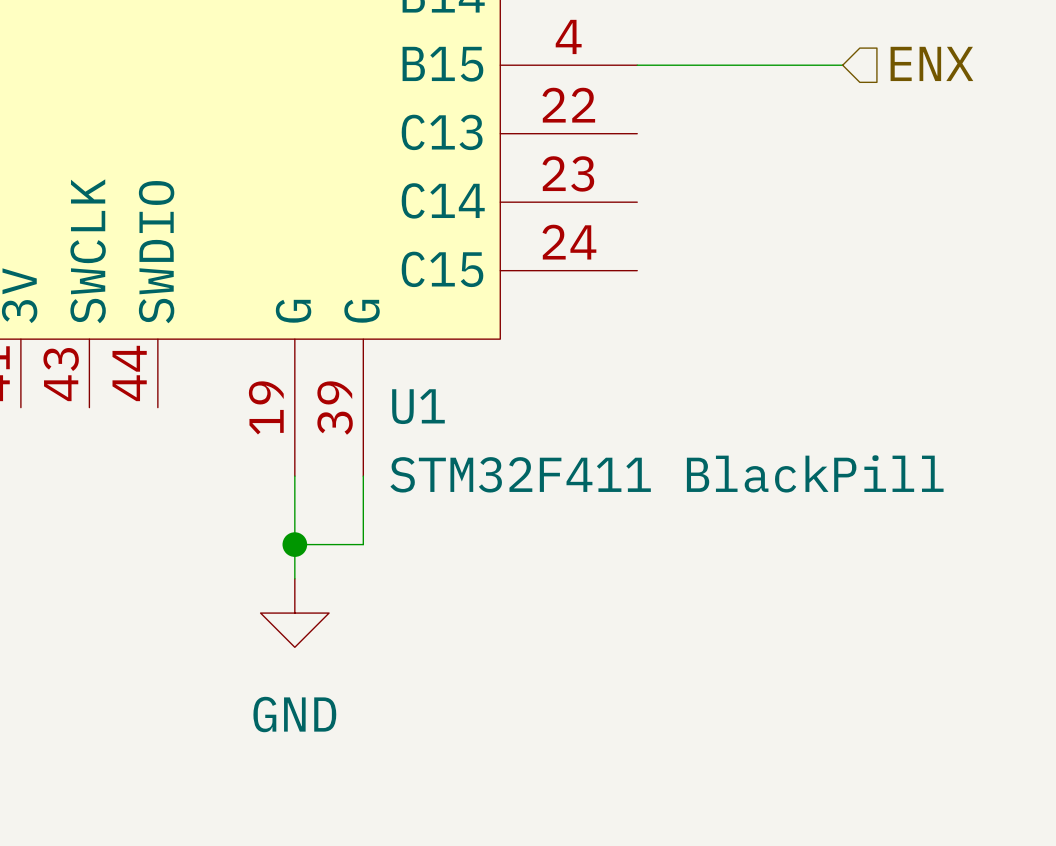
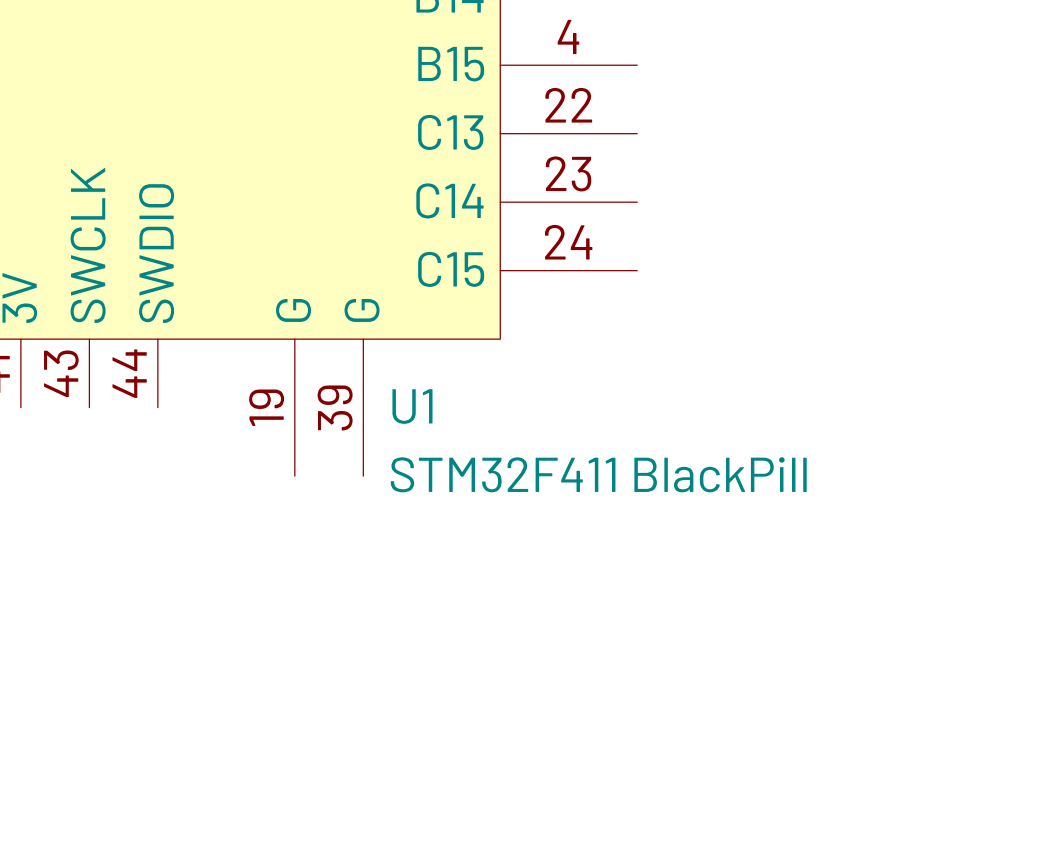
hierarchical label: ENX (931, 63) -> none
wire: (637, 65) (842, 65) -> none
wire: (294, 476) (294, 578) -> none
wire: (363, 476) (363, 544) (294, 544) -> none
junction: (294, 544) -> none
power symbol: GND (294, 613) -> none

